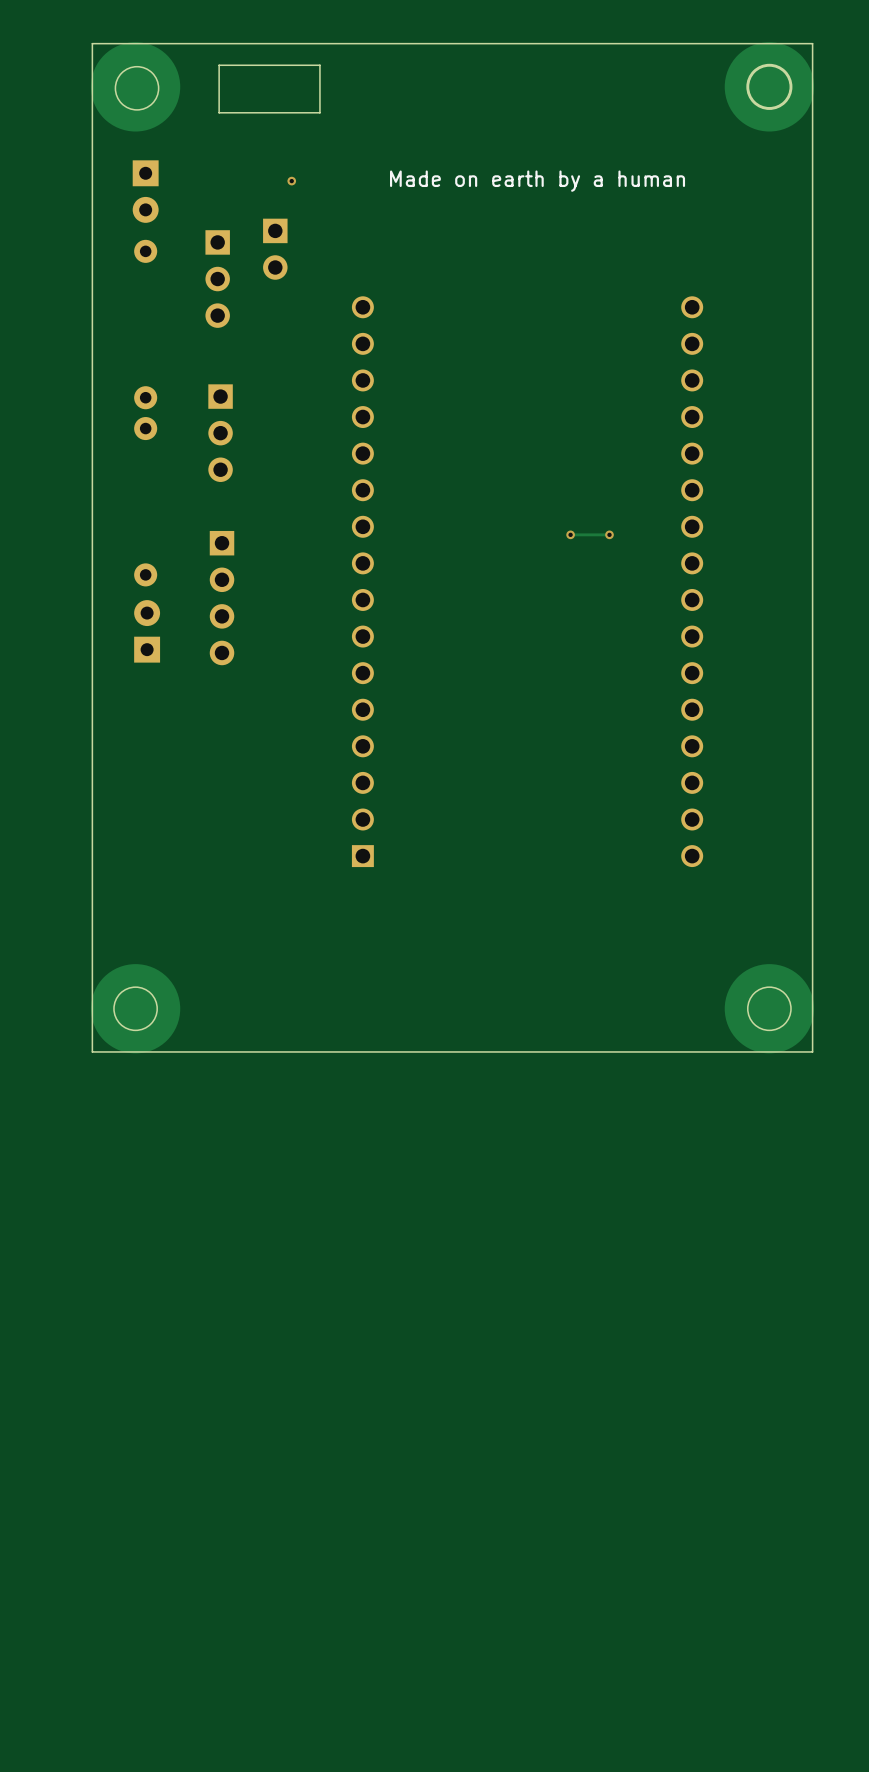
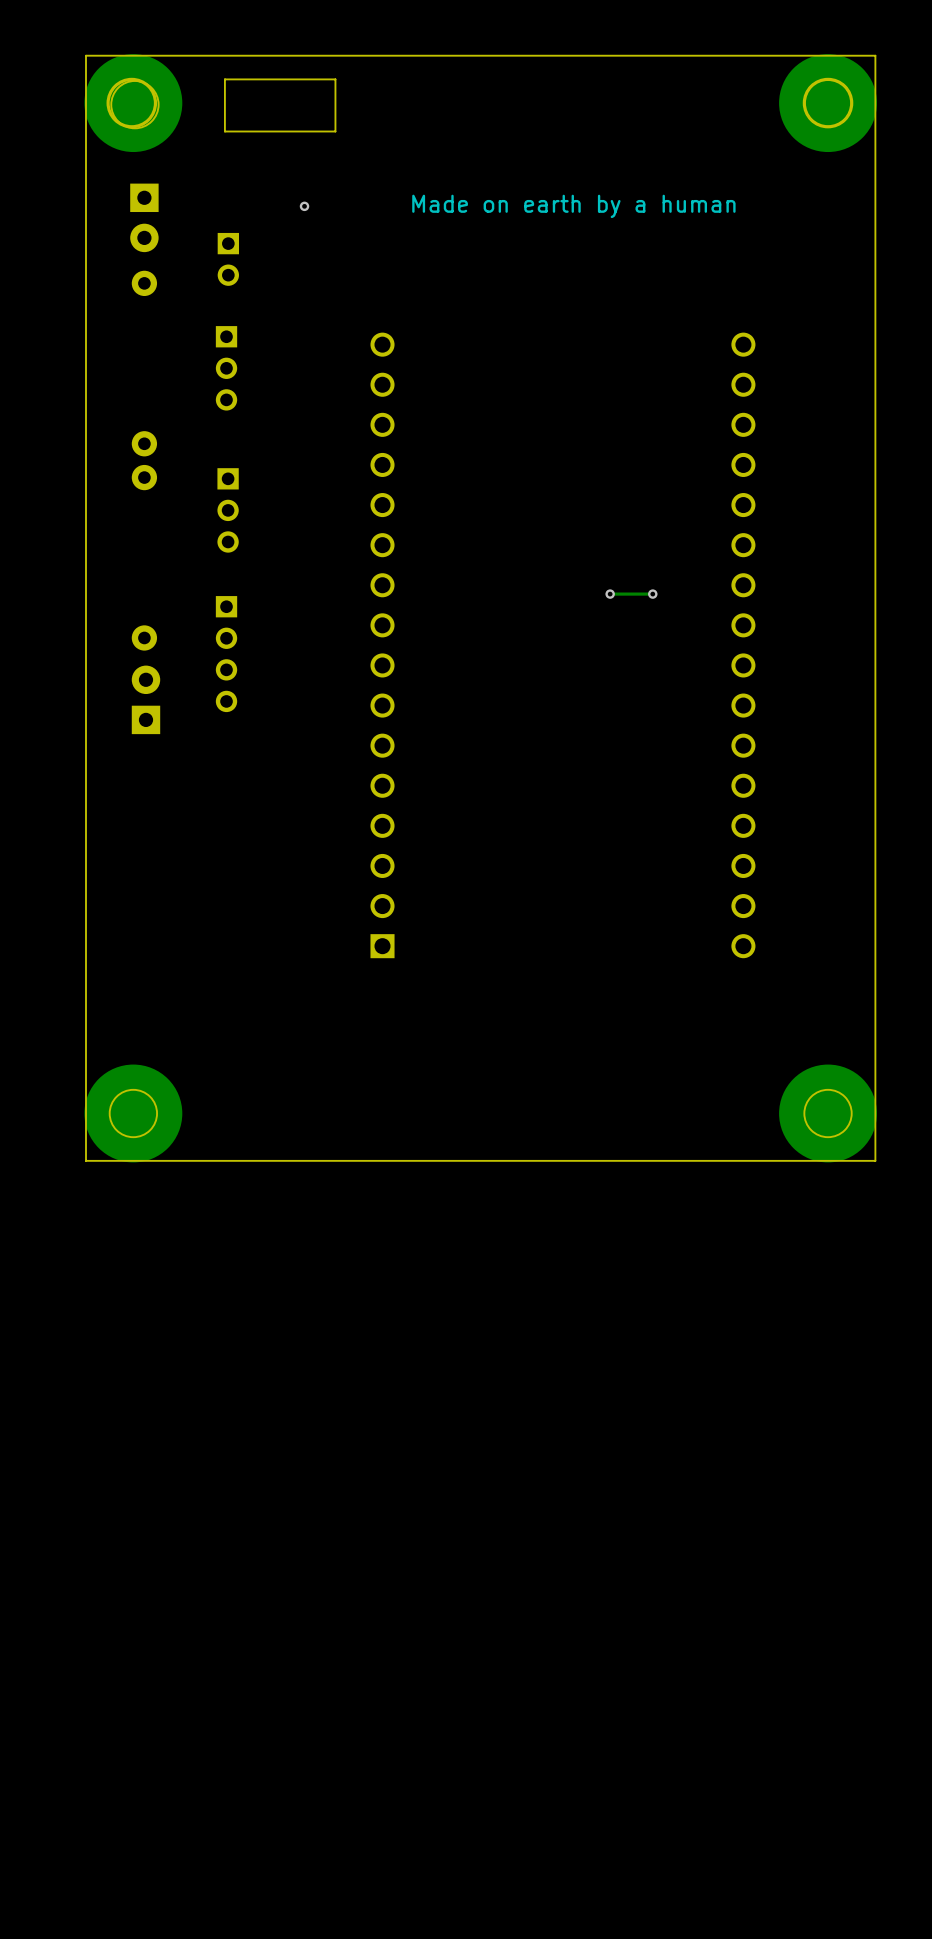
round board edge: none -> [106, 77, 158, 129]
part: none -> (228, 259)
part: (275, 249) -> none
part: (217, 279) -> none
part: none -> (226, 368)
part: (220, 433) -> none
part: none -> (228, 510)
part footprint: [209, 530, 235, 666] -> [215, 596, 238, 713]

